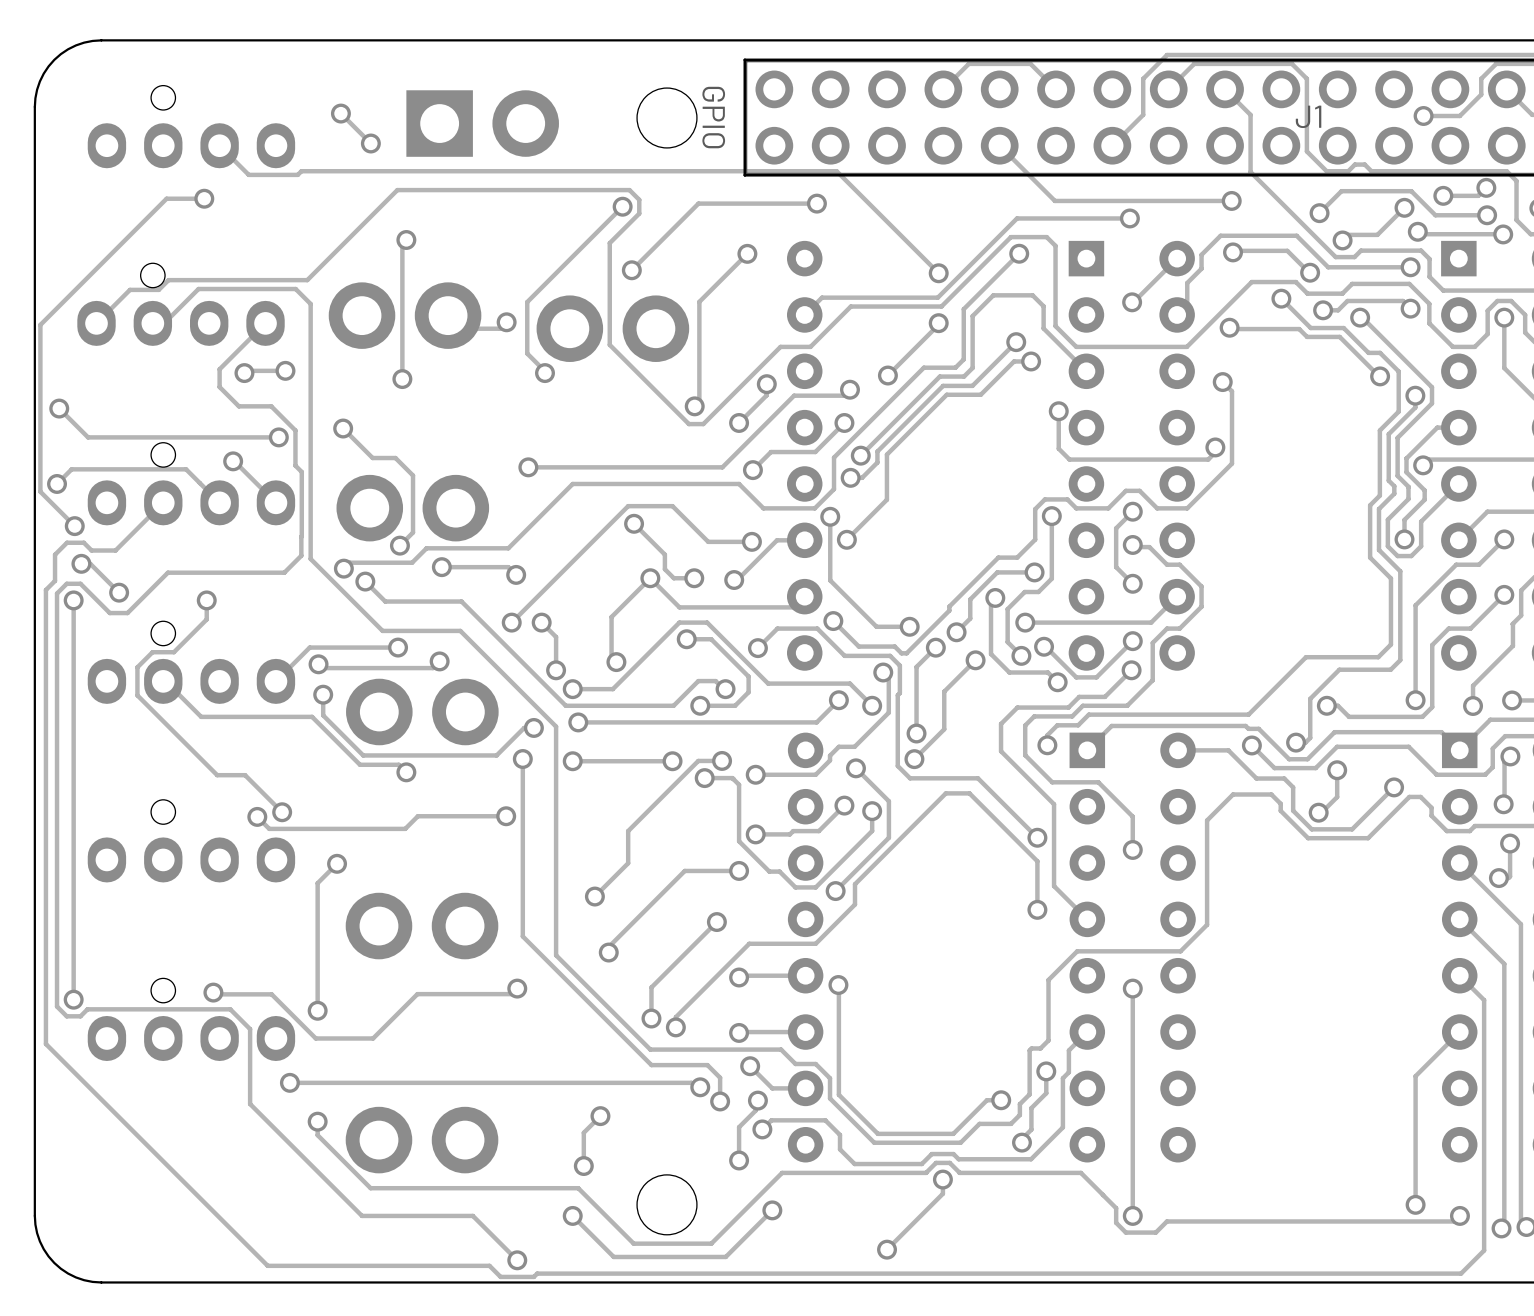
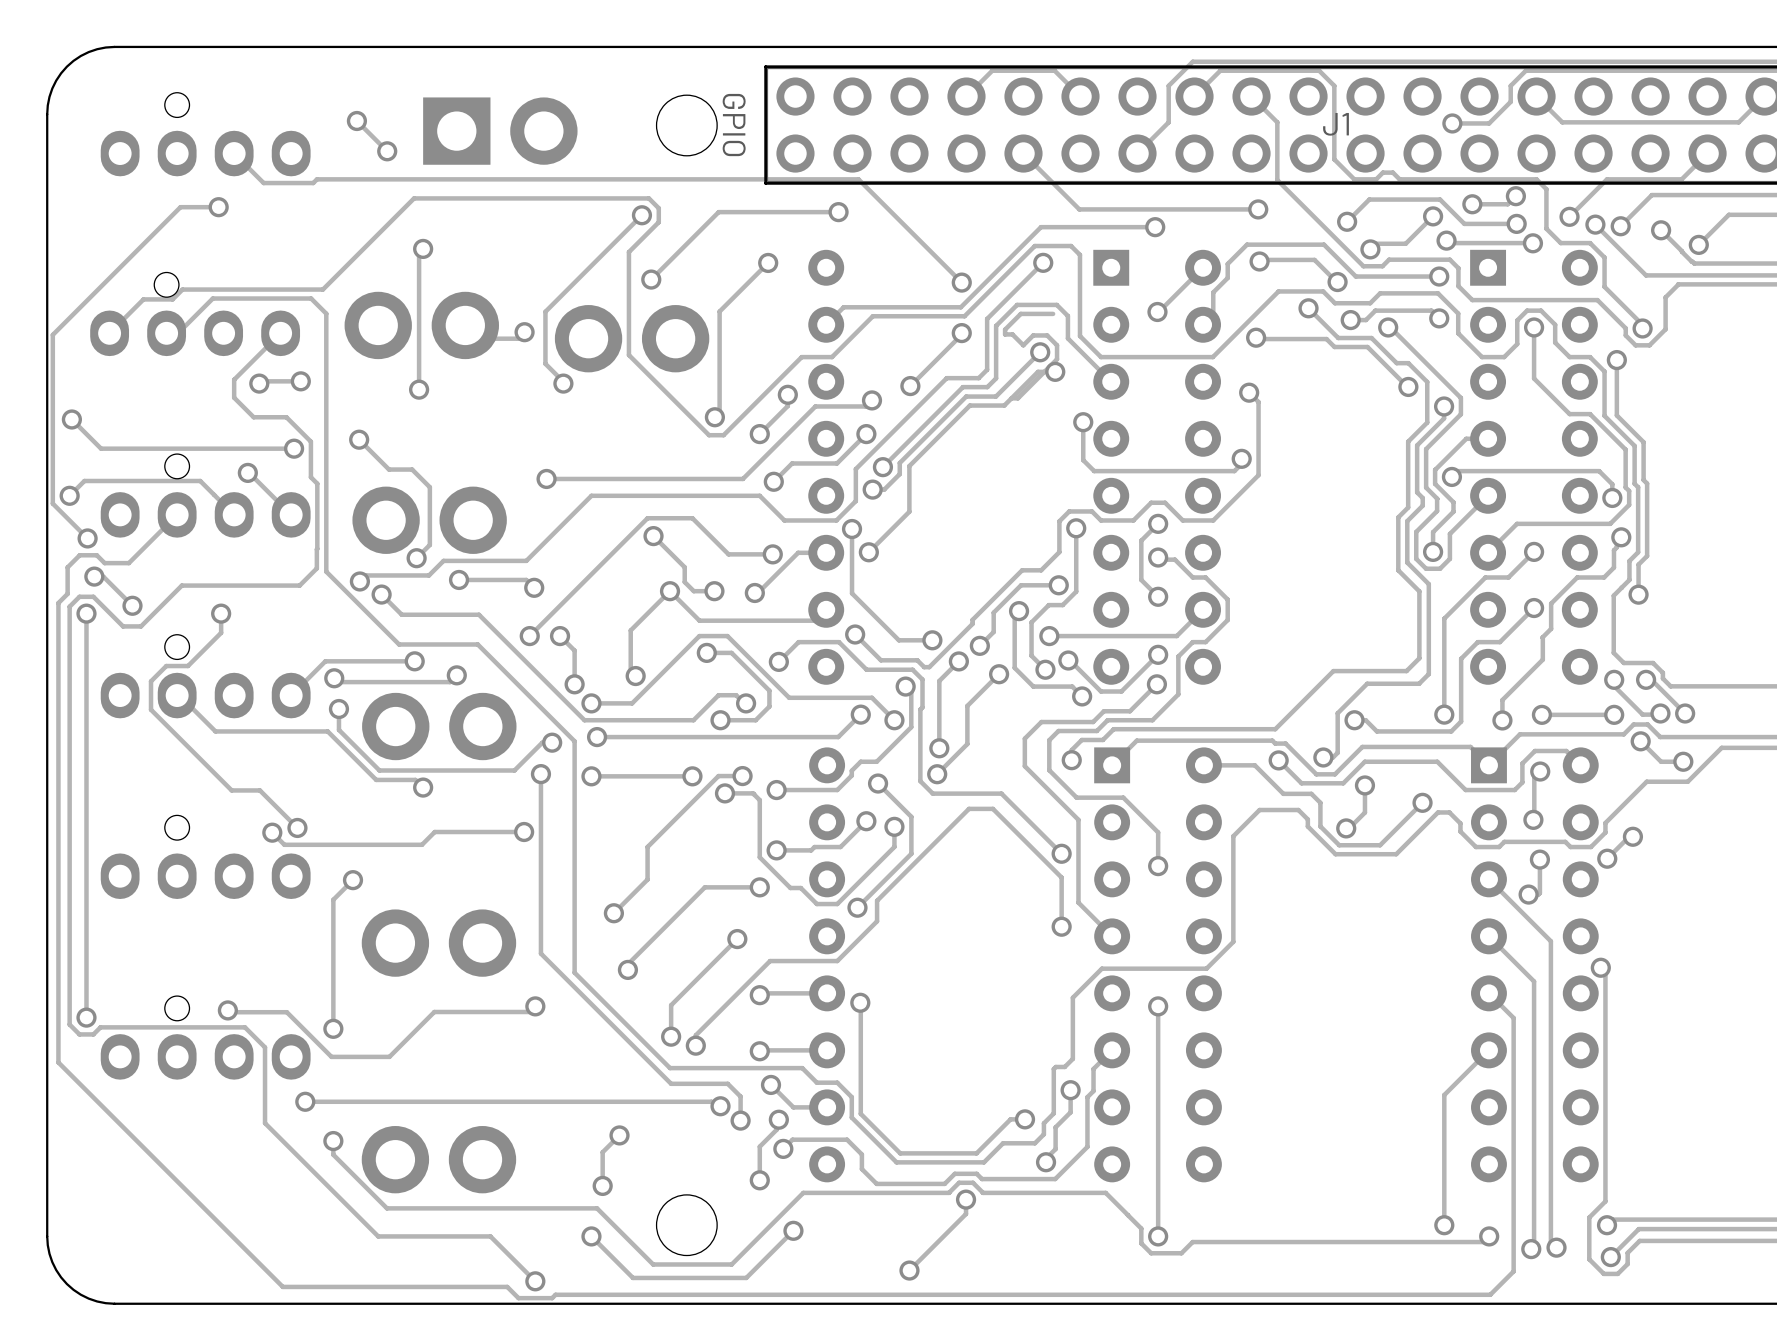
track: none -> (1053, 313) (1020, 313) (1005, 329) (1005, 334) (1012, 334) (1023, 345) (1033, 335) (1047, 335) (1057, 345) (1057, 359) (1017, 398) (1011, 398)

